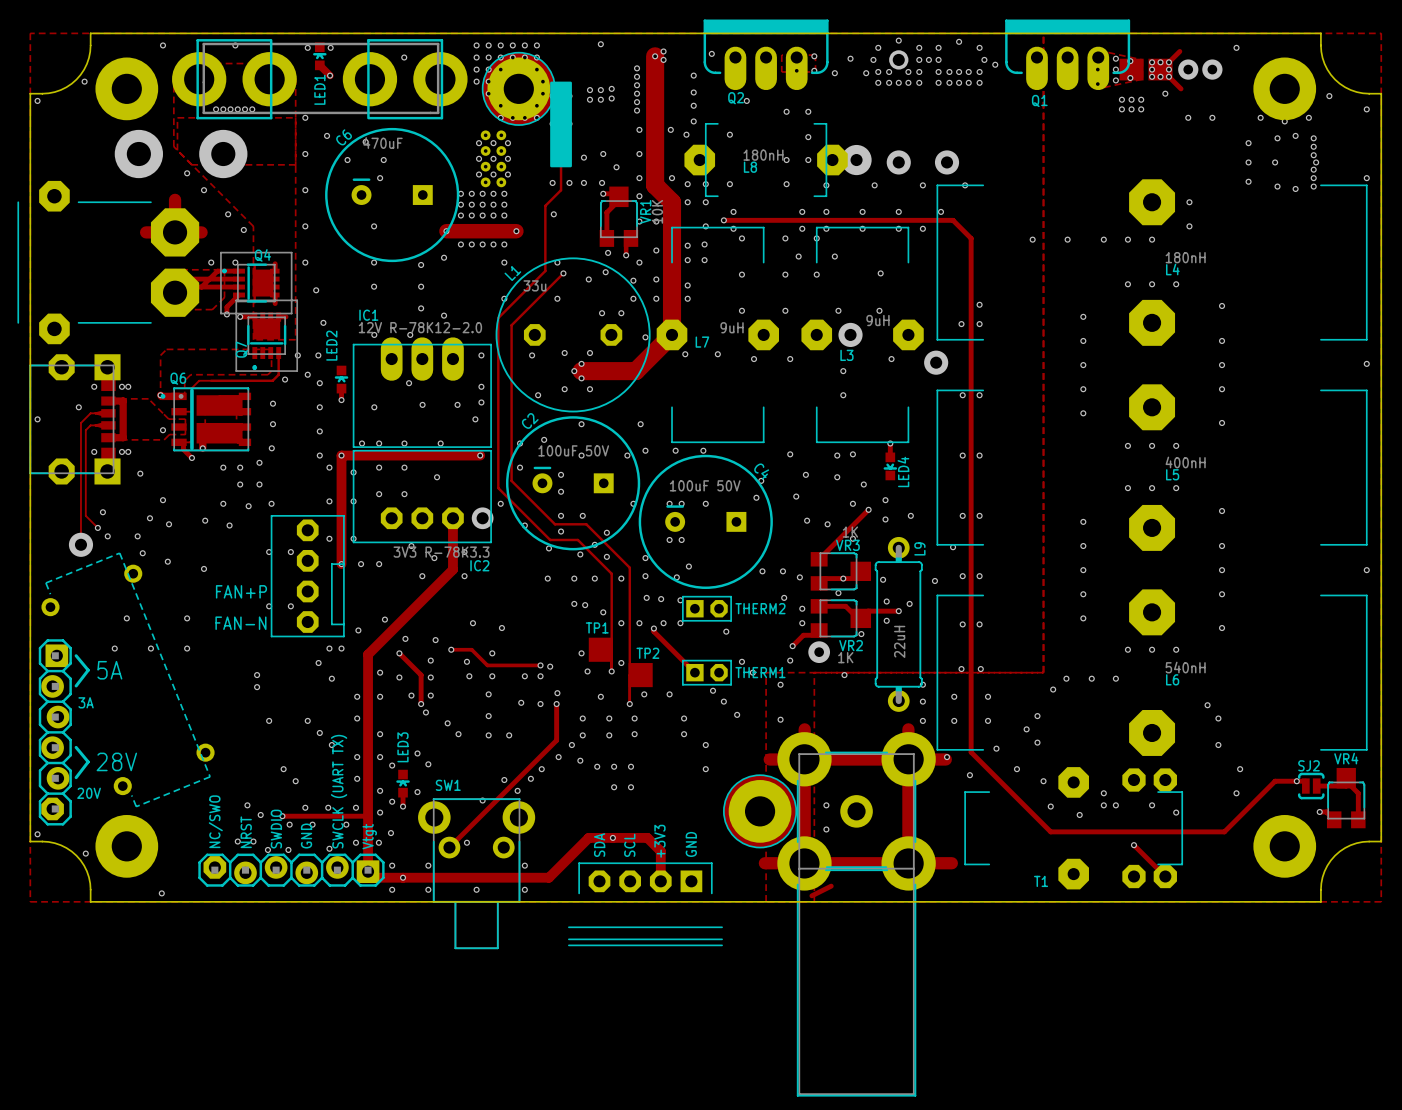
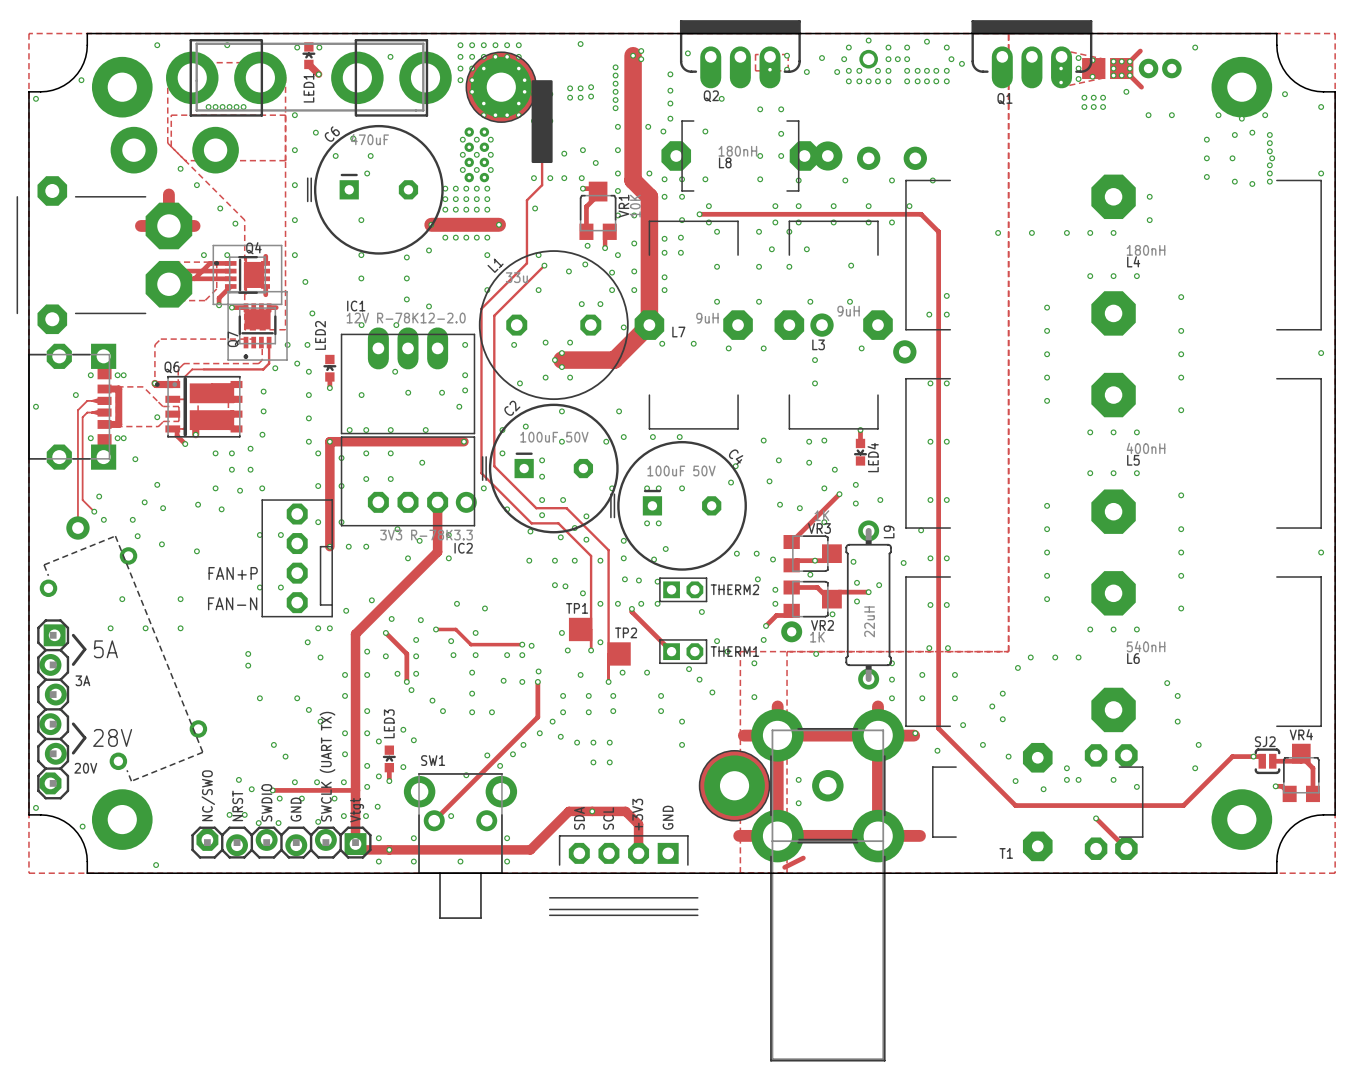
C6 footprint: [325, 127, 460, 263] -> [306, 124, 444, 255]
C2 footprint: [506, 416, 641, 551] -> [481, 403, 619, 534]
C4 footprint: [638, 454, 773, 589] -> [610, 440, 747, 571]

